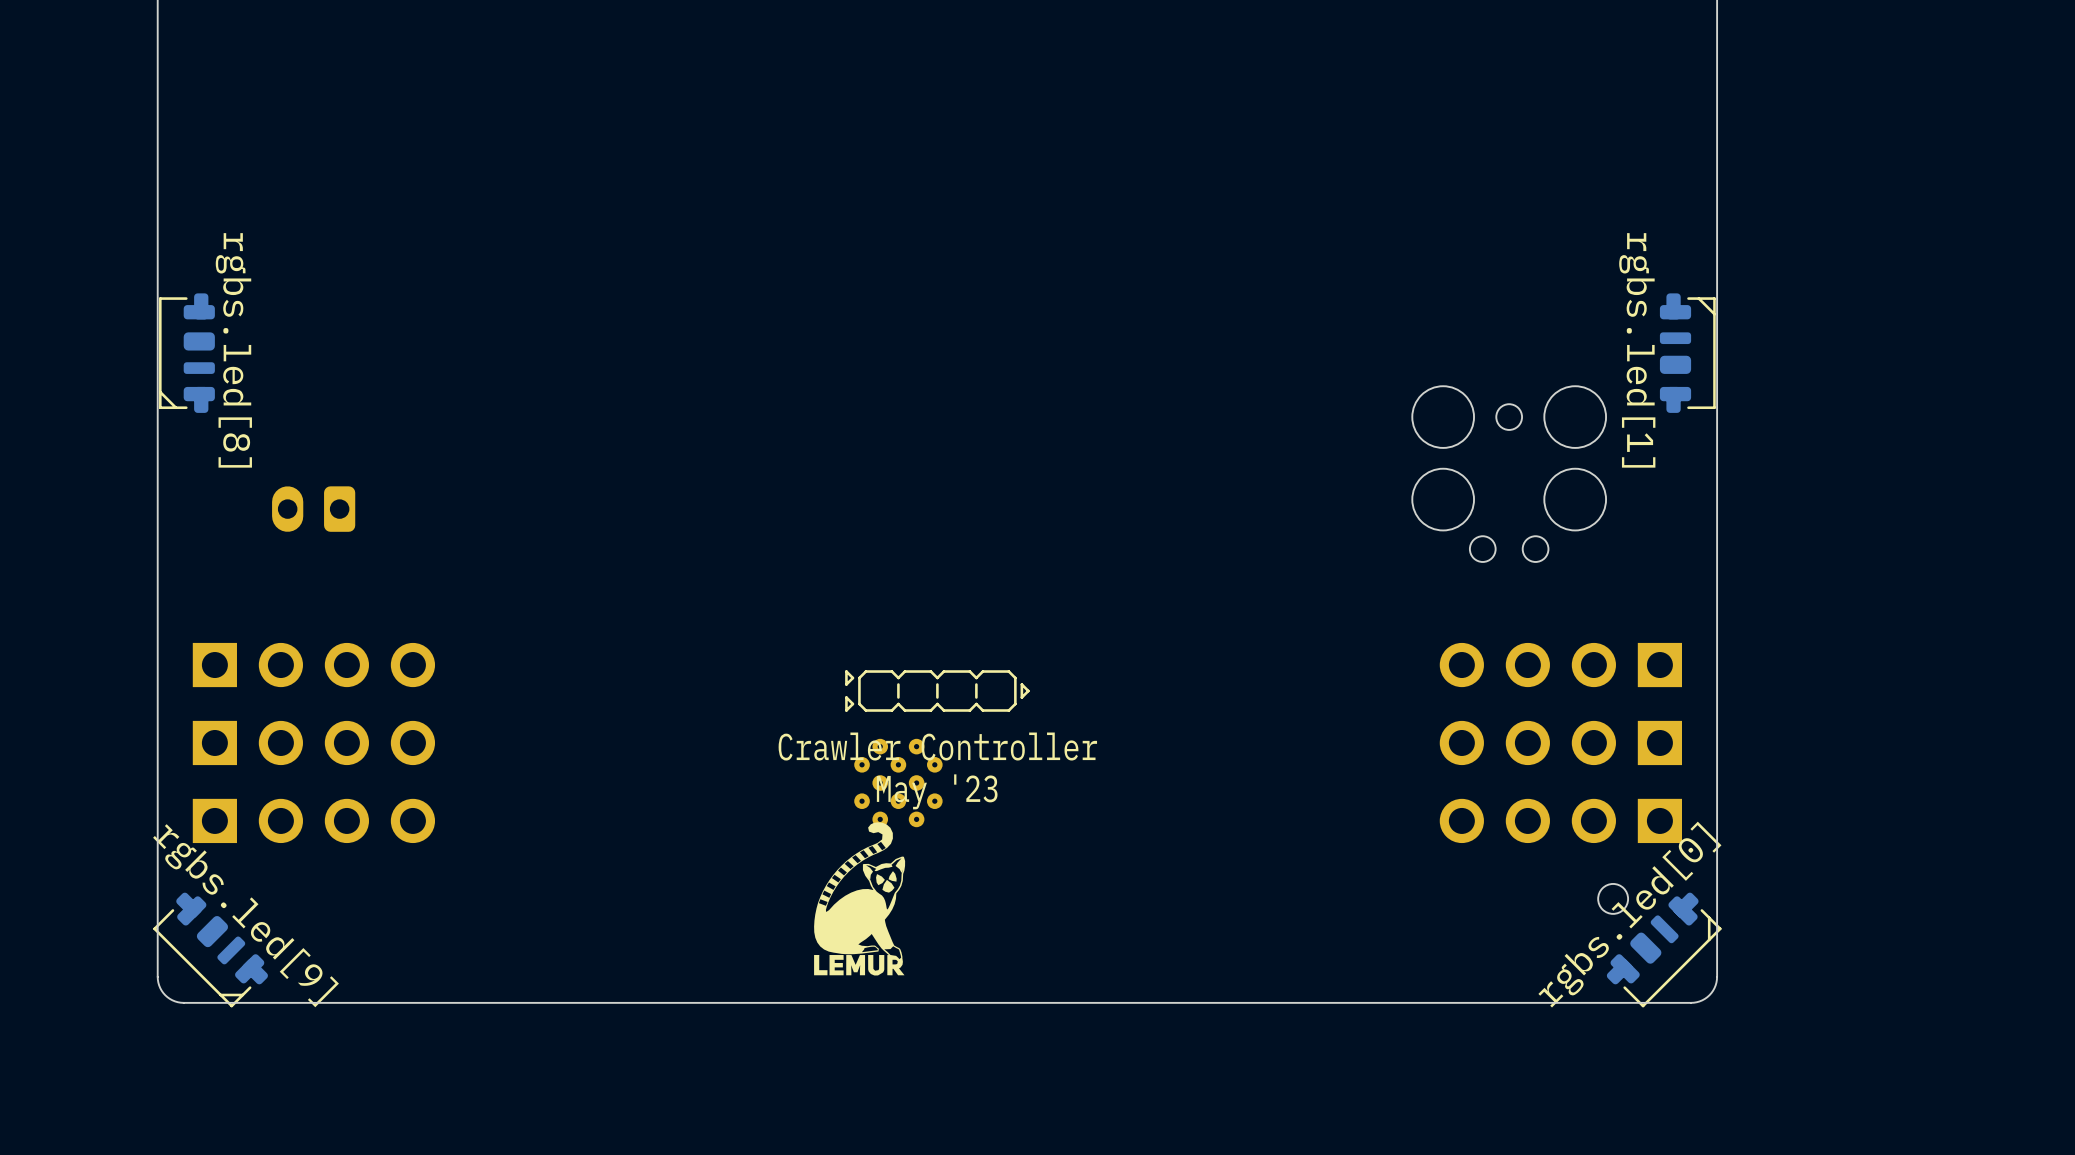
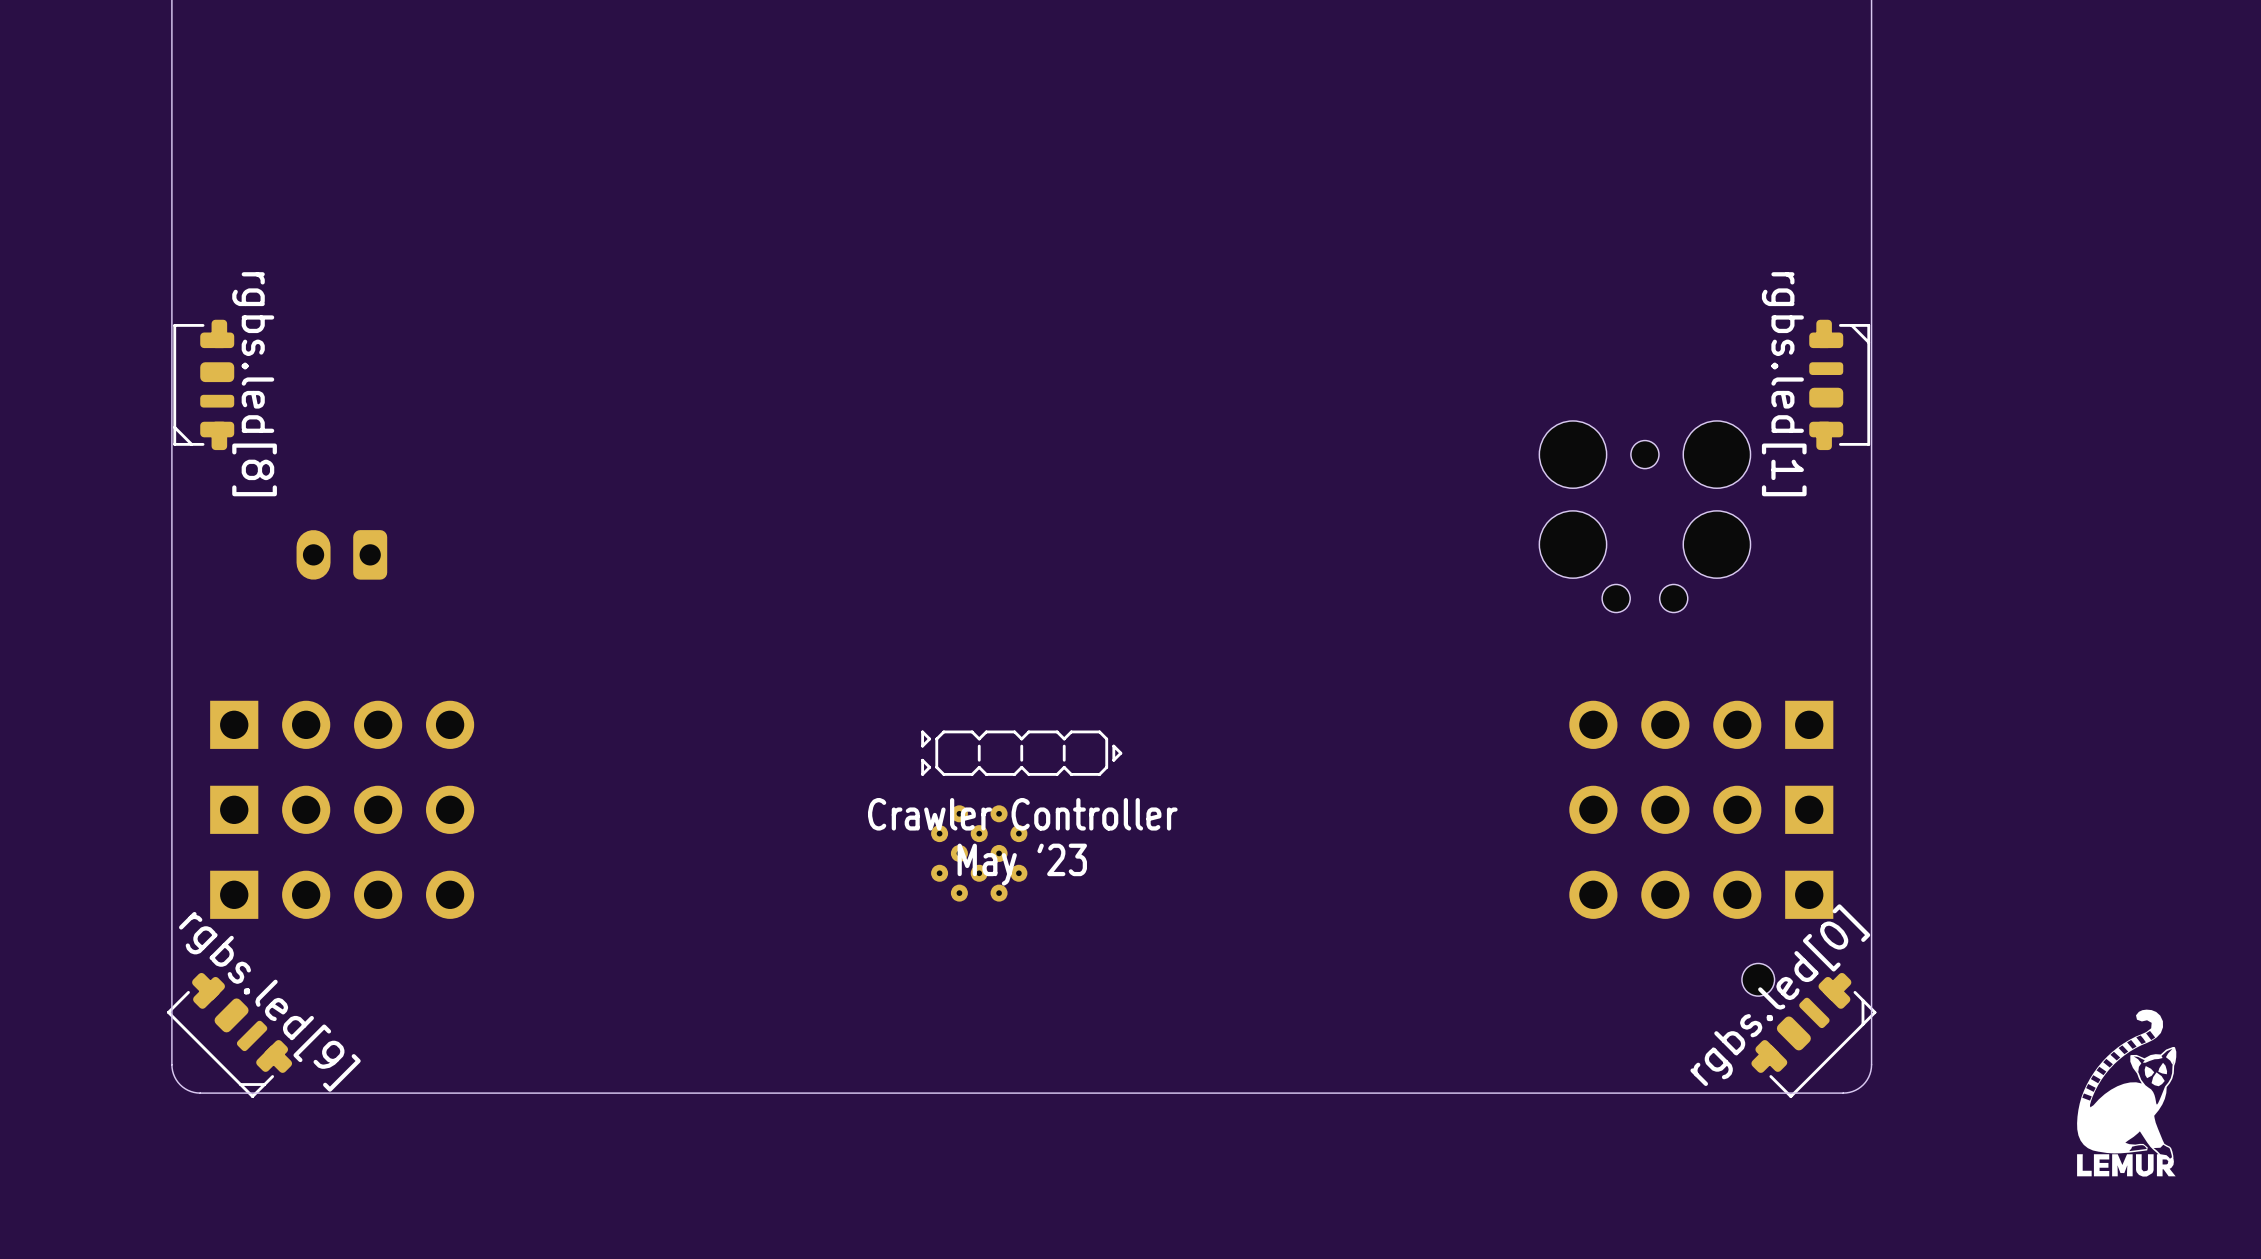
drawing: [814, 822, 906, 976] -> none
drawing: none -> [2077, 1009, 2177, 1177]

